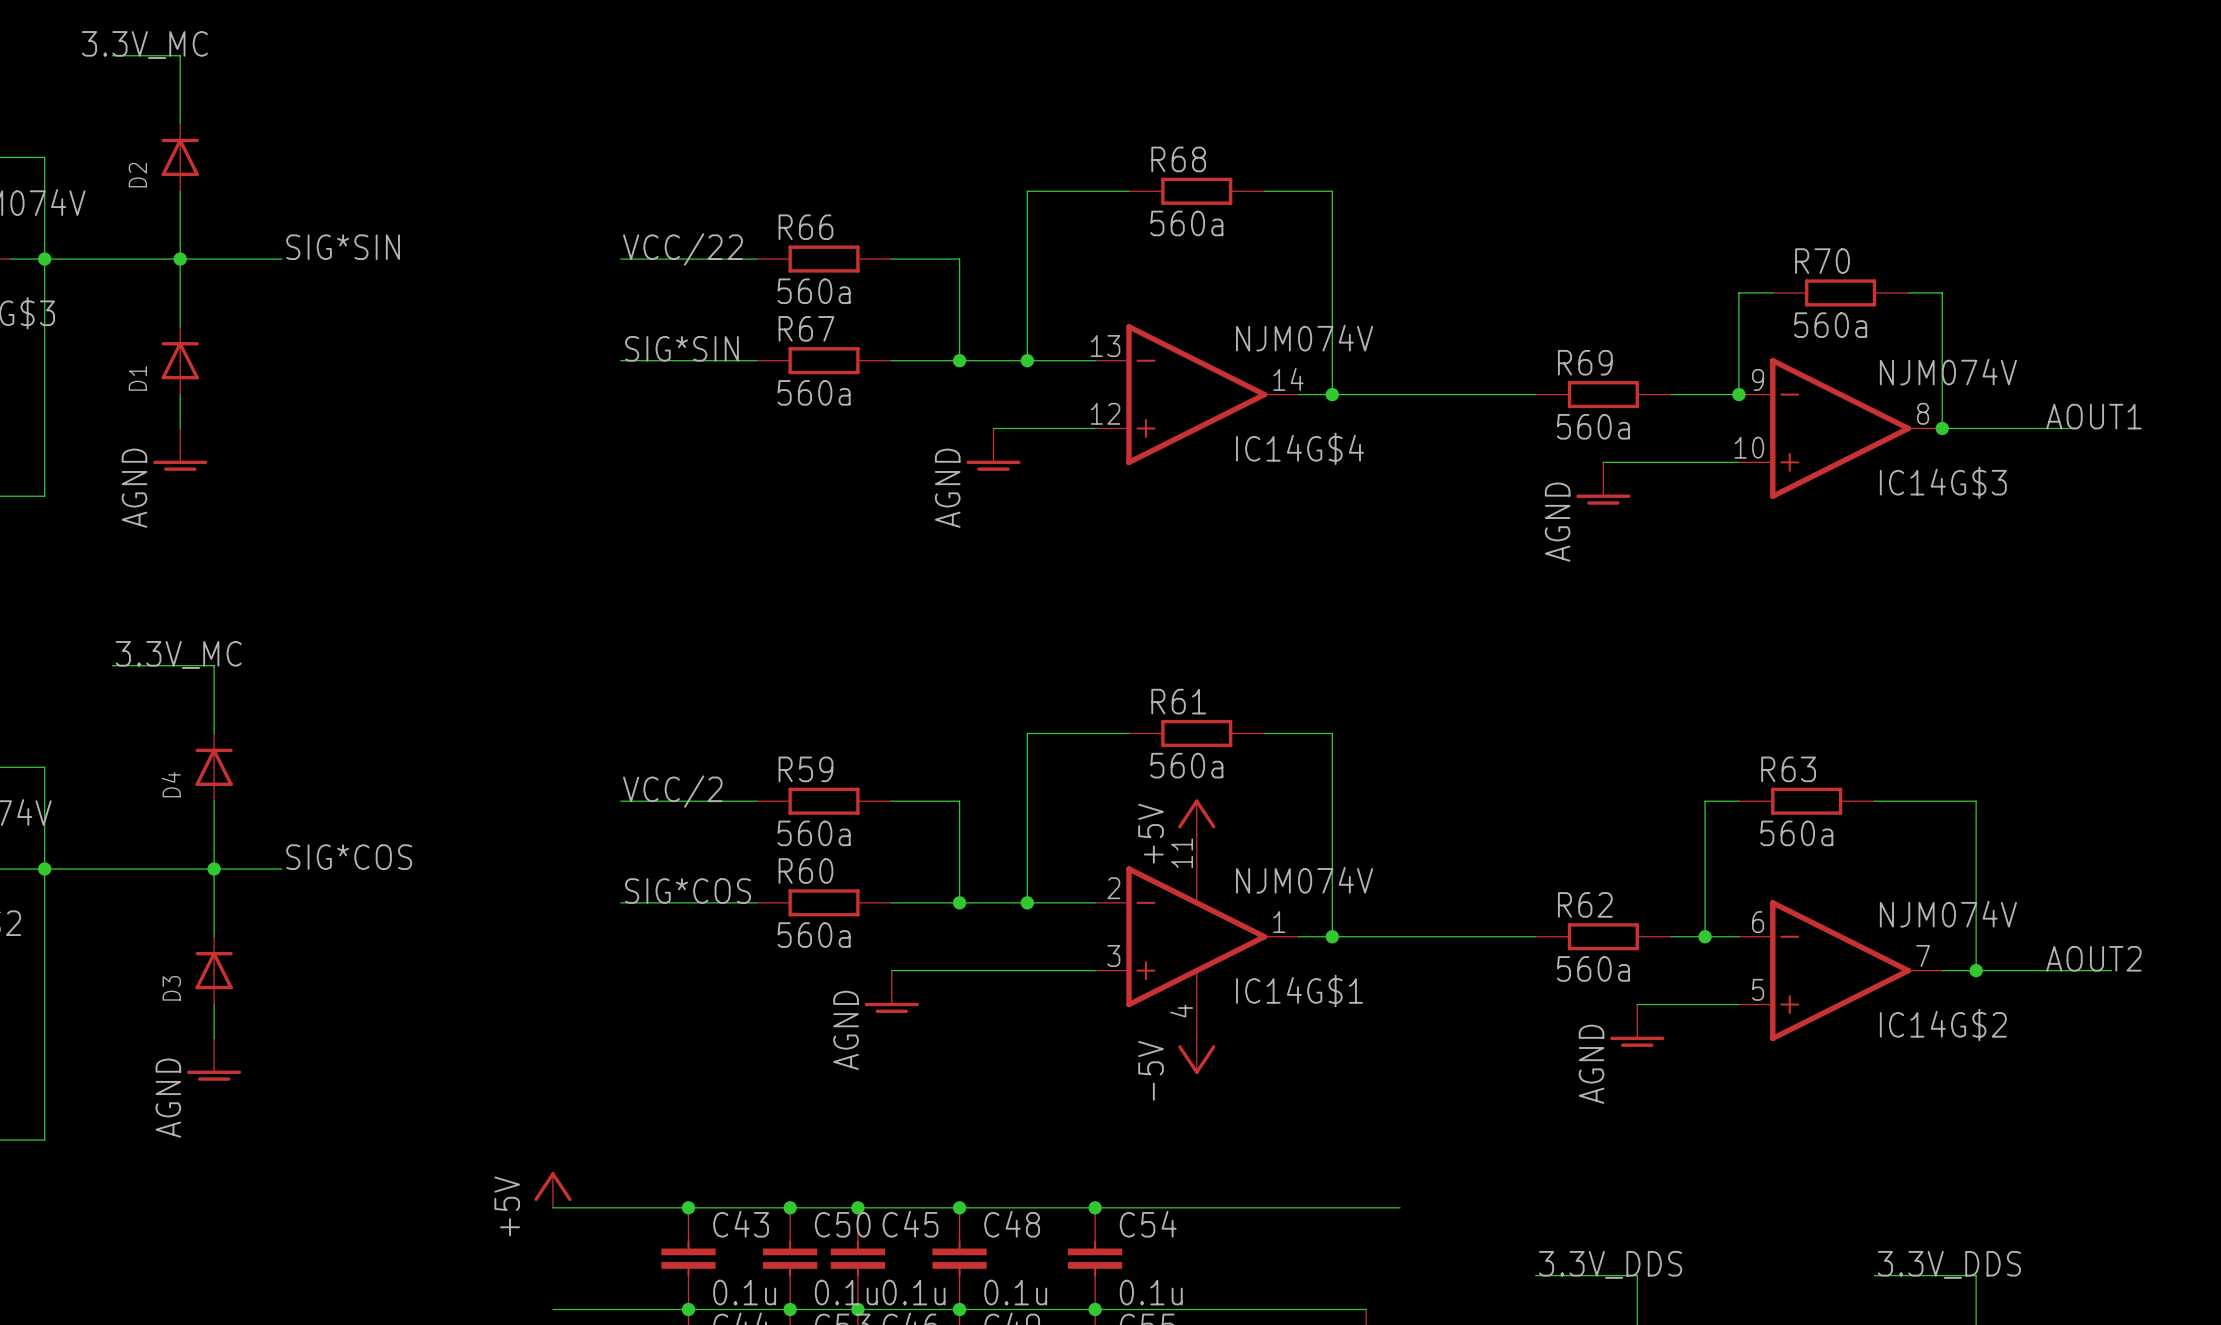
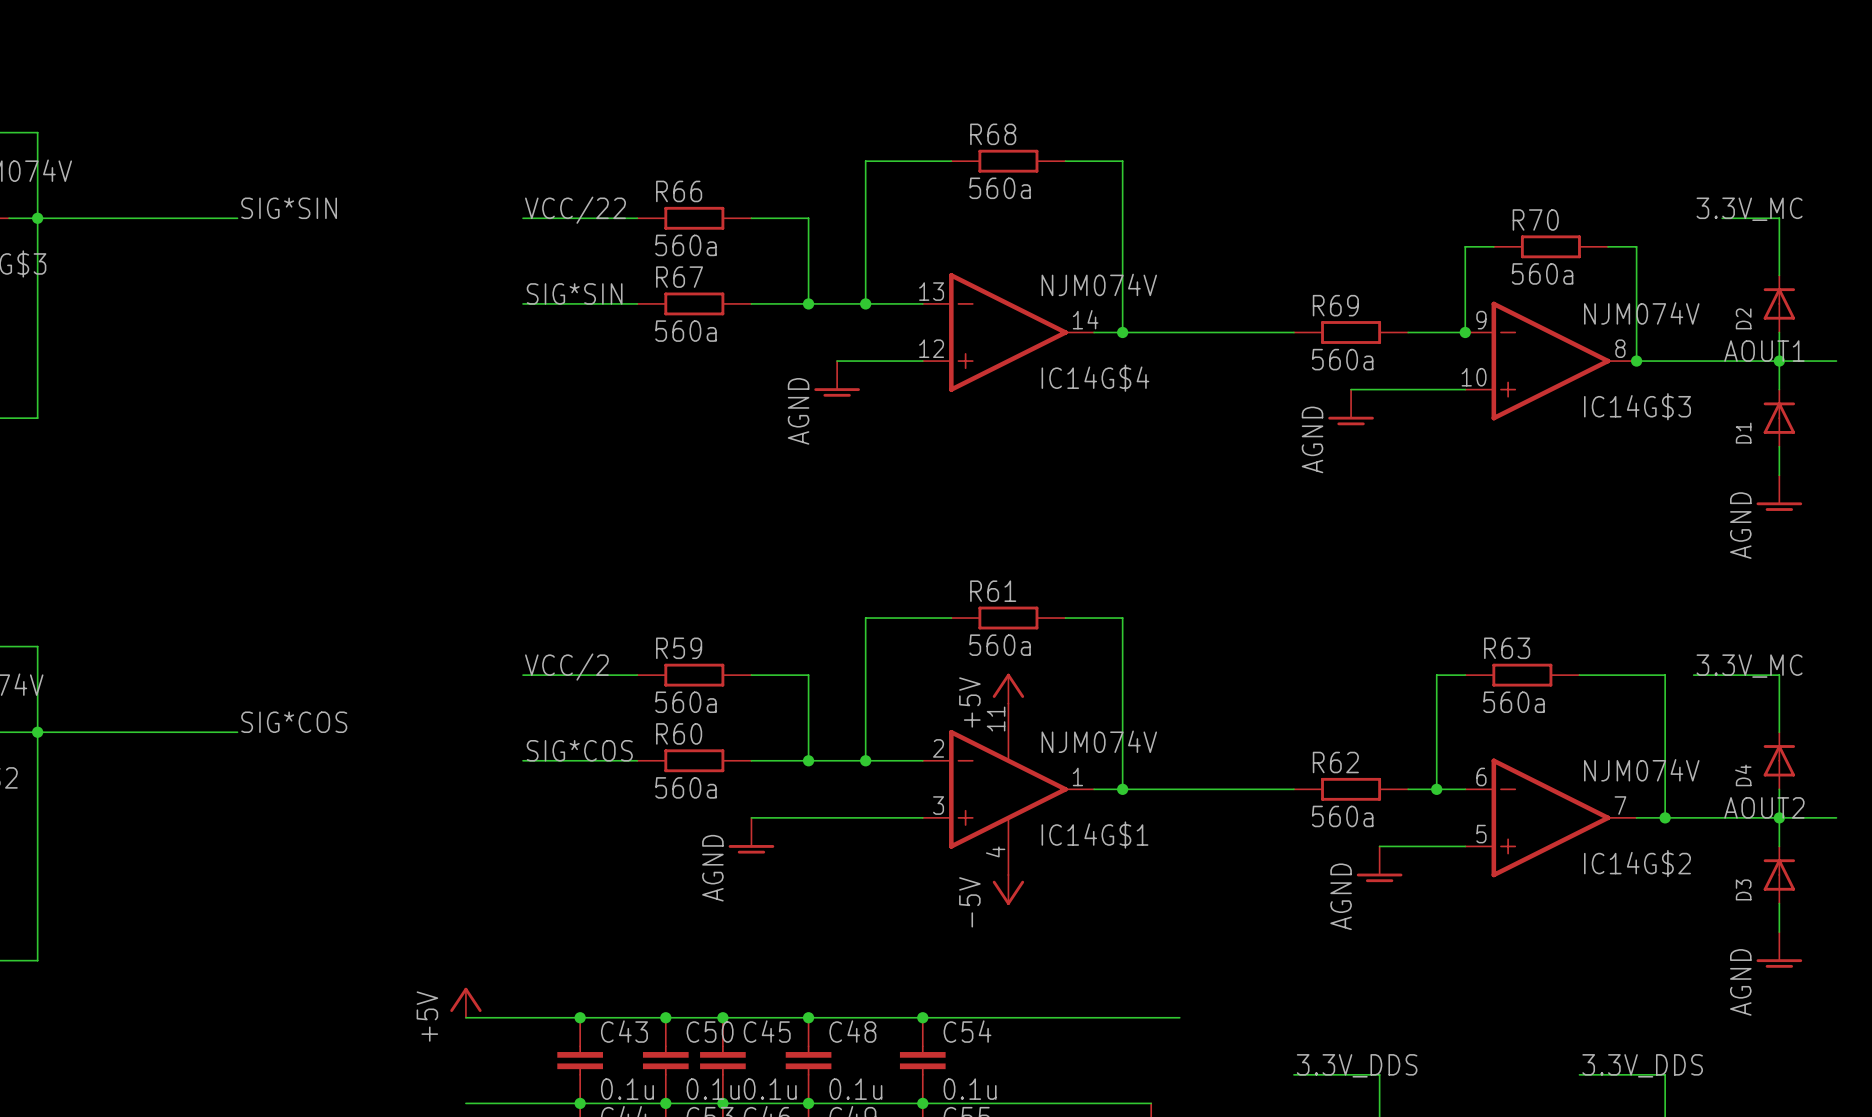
label: 3.3V_MC (144, 45) -> none
wire: (112, 55) (180, 55) (180, 123) -> none
D2 position: (180, 157) -> (1779, 303)
wire: (180, 191) (180, 326) -> none
label: none -> 3.3V_MC (1749, 209)
junction: (180, 259) -> none
wire: none -> (1722, 218) (1779, 218) (1779, 275)
D1 position: (180, 360) -> (1779, 418)
wire: (180, 394) (180, 428) -> none
wire: none -> (1779, 332) (1779, 389)
wire: none -> (1750, 361) (1836, 361)
junction: none -> (1779, 361)
power symbol: AGND (180, 449) -> none
wire: none -> (1779, 446) (1779, 475)
power symbol: none -> AGND (1779, 493)
label: 3.3V_MC (178, 654) -> none
wire: (112, 665) (214, 665) (214, 733) -> none
D4 position: (214, 767) -> (1779, 760)
label: none -> 3.3V_MC (1749, 666)
wire: (214, 801) (214, 936) -> none
wire: none -> (1693, 675) (1779, 675) (1779, 732)
junction: (214, 868) -> none
wire: none -> (1779, 789) (1779, 846)
D3 position: (214, 970) -> (1779, 874)
wire: none -> (1779, 817) (1836, 817)
junction: none -> (1779, 817)
wire: (214, 1004) (214, 1038) -> none
power symbol: AGND (214, 1059) -> none
wire: none -> (1779, 903) (1779, 932)
power symbol: none -> AGND (1779, 949)

